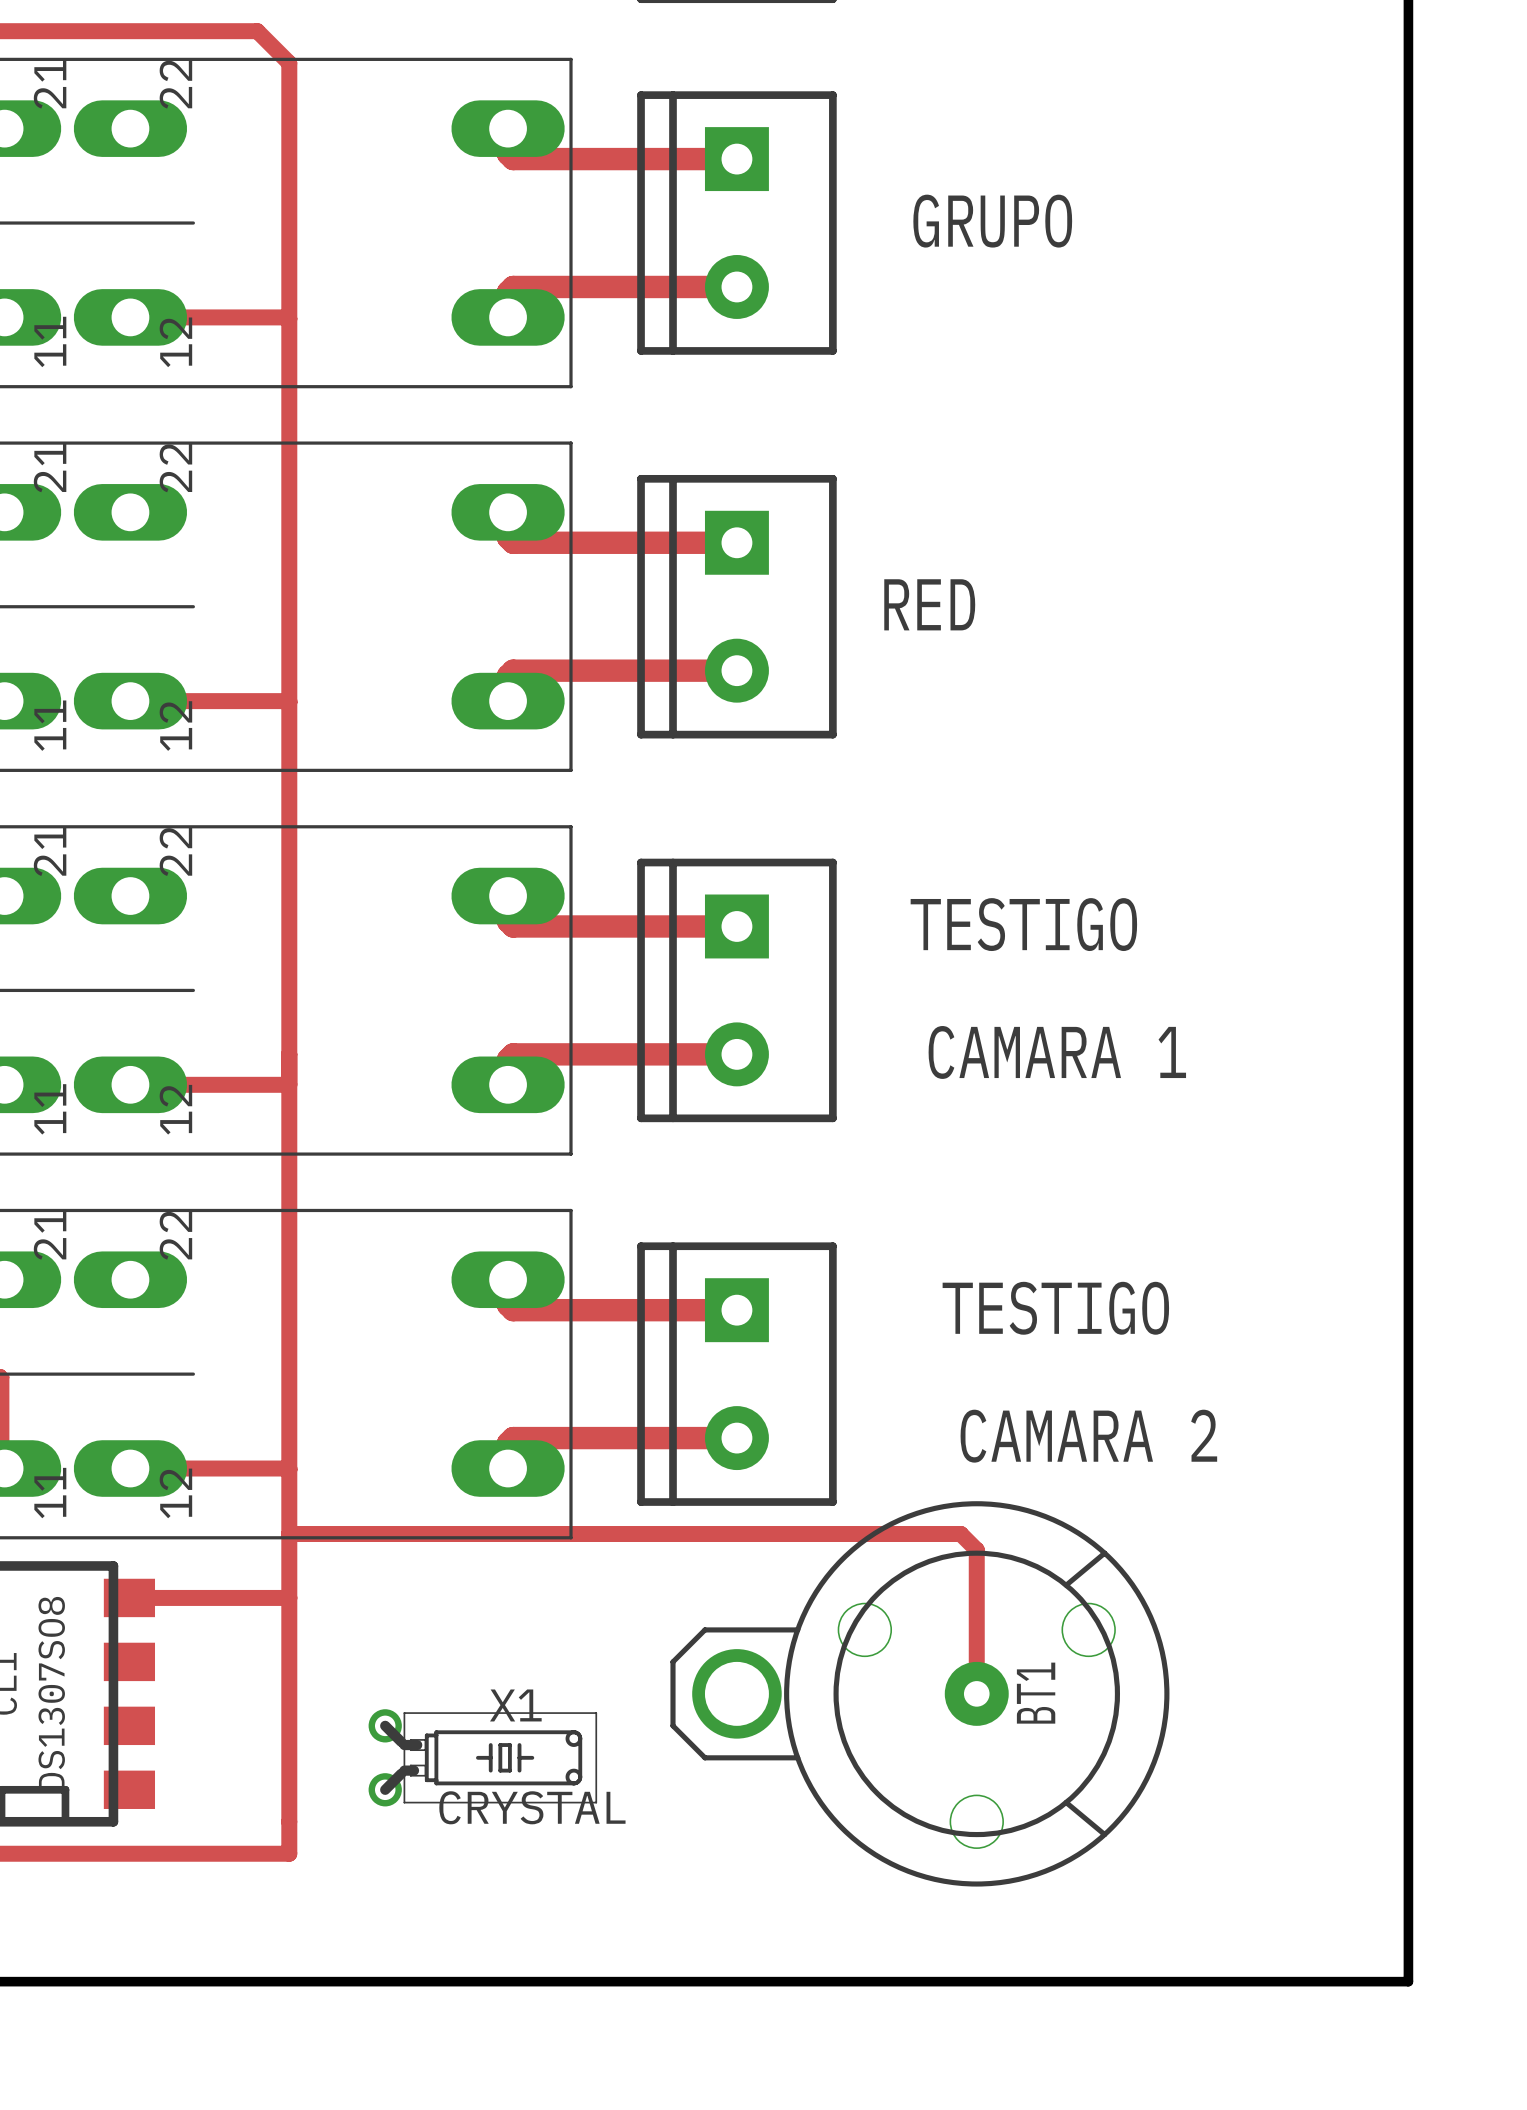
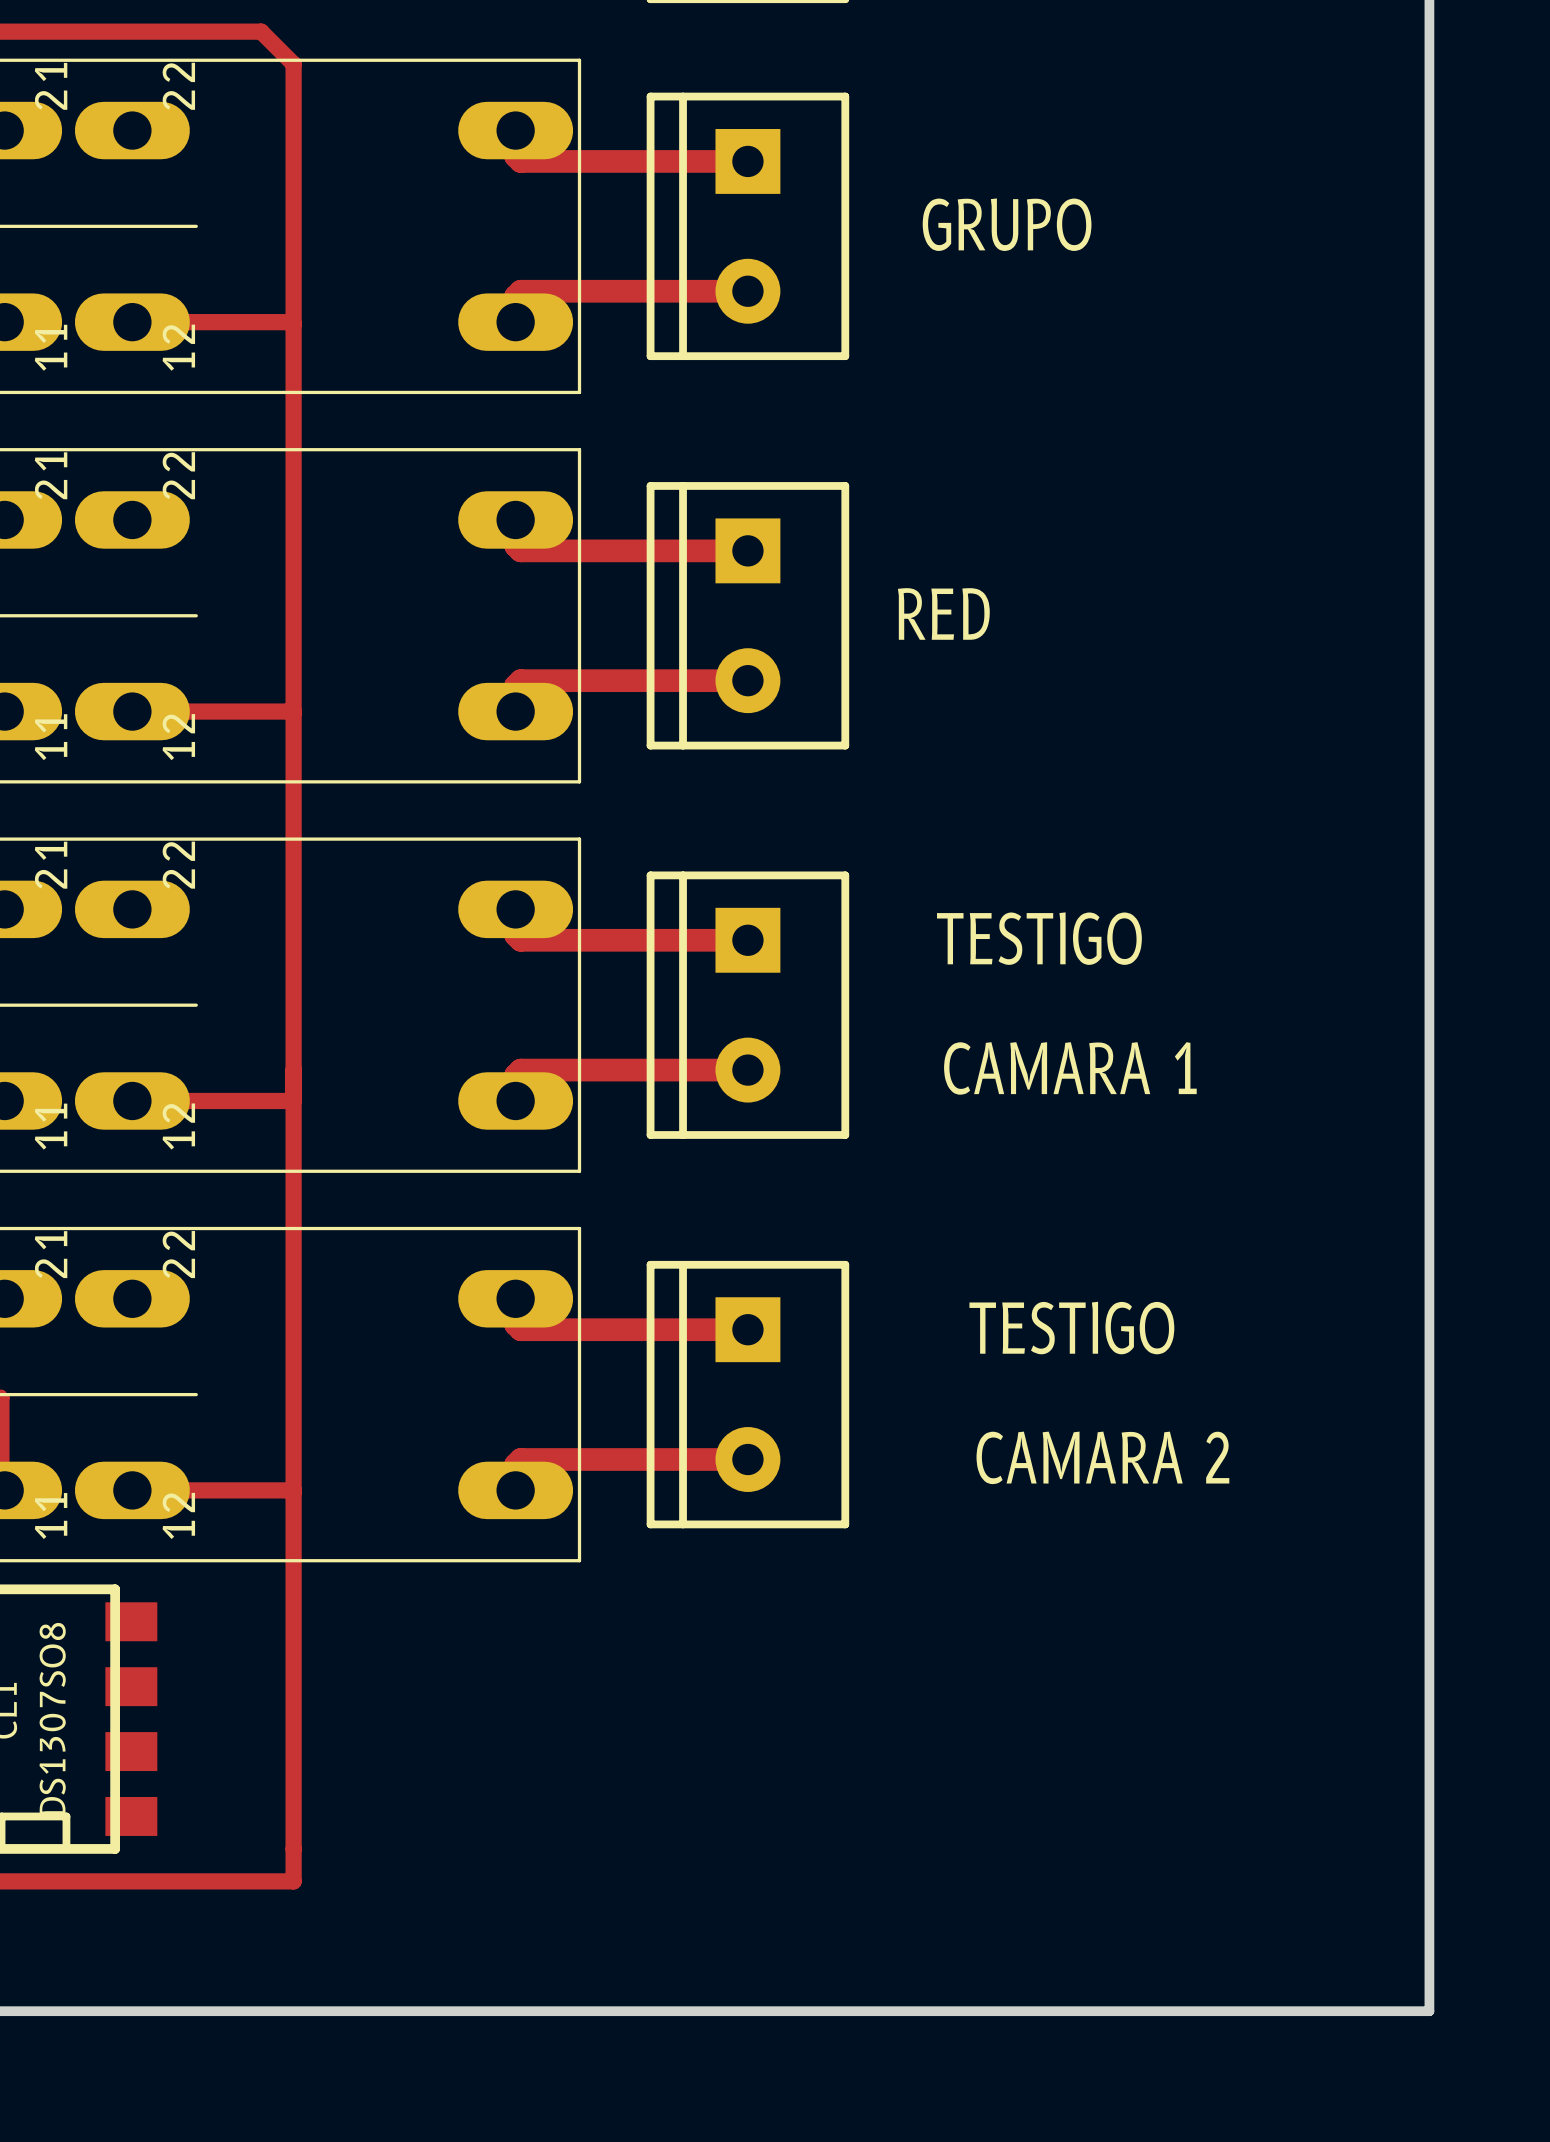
track: (289, 1534) (960, 1534) (976, 1549) (976, 1693) -> none
track: (129, 1597) (289, 1597) -> none
BT1: (919, 1693) -> none
X1: CRYSTAL (482, 1757) -> none

